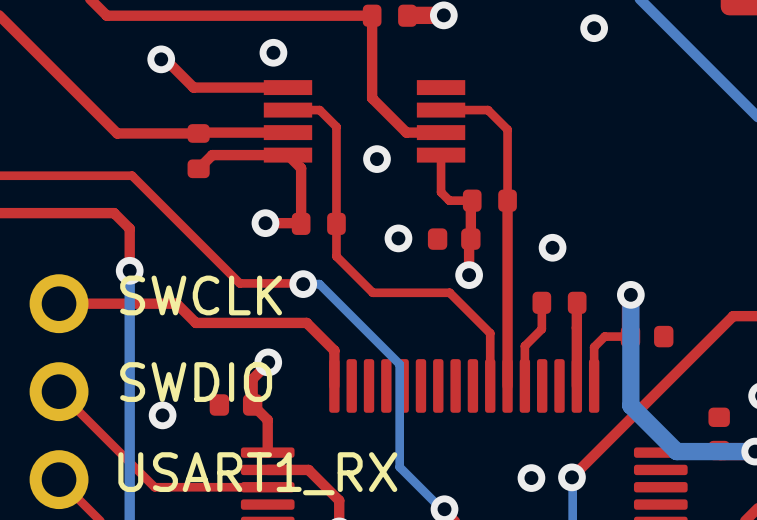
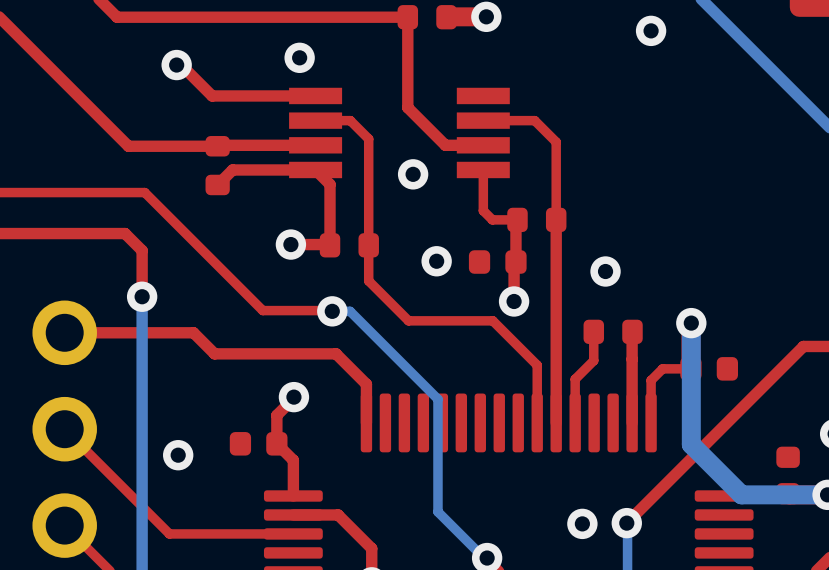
text: SWCLK (201, 295) -> none
text: SWDIO (196, 382) -> none
text: USART1_RX (257, 473) -> none

